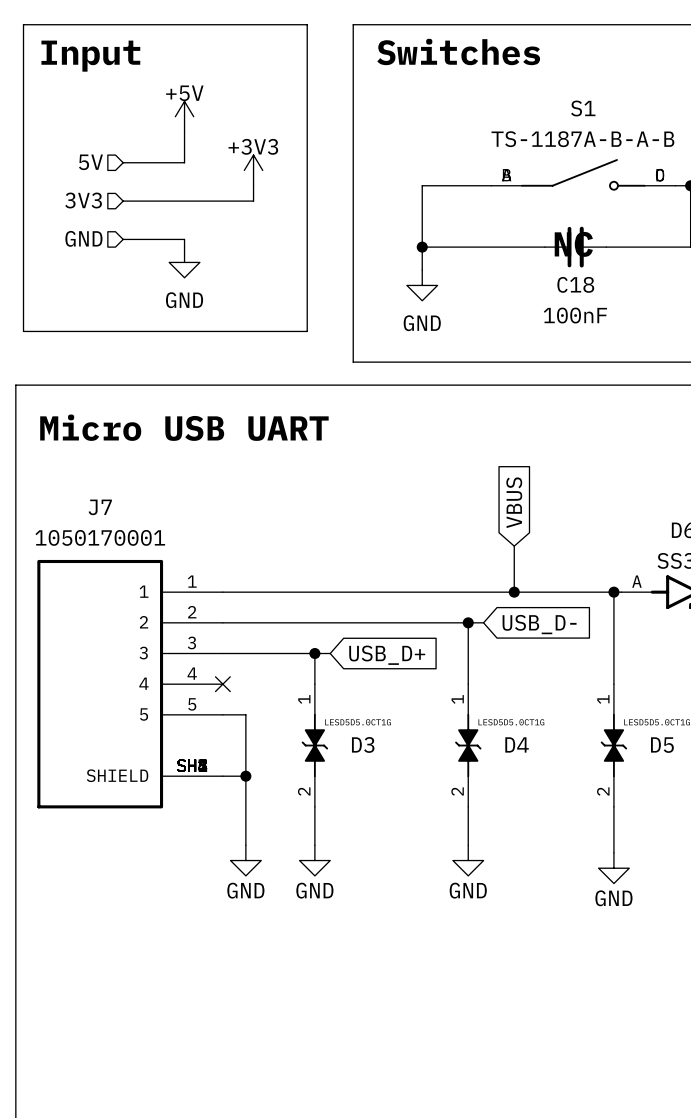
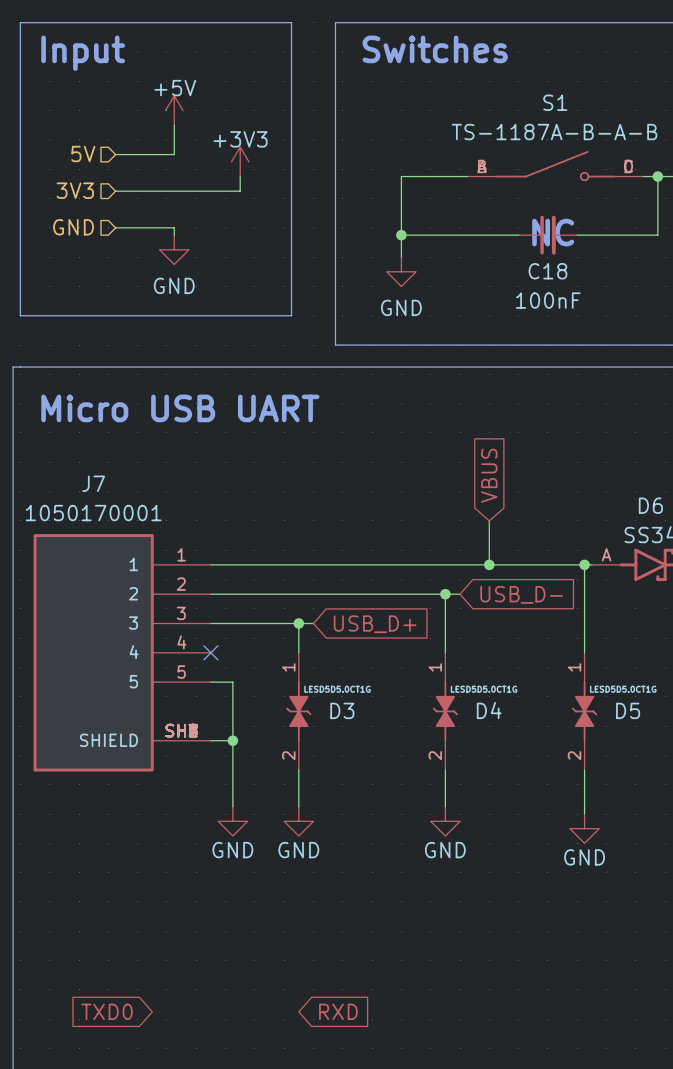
global label: none -> TXD0 (107, 1011)
global label: none -> RXD (338, 1011)

